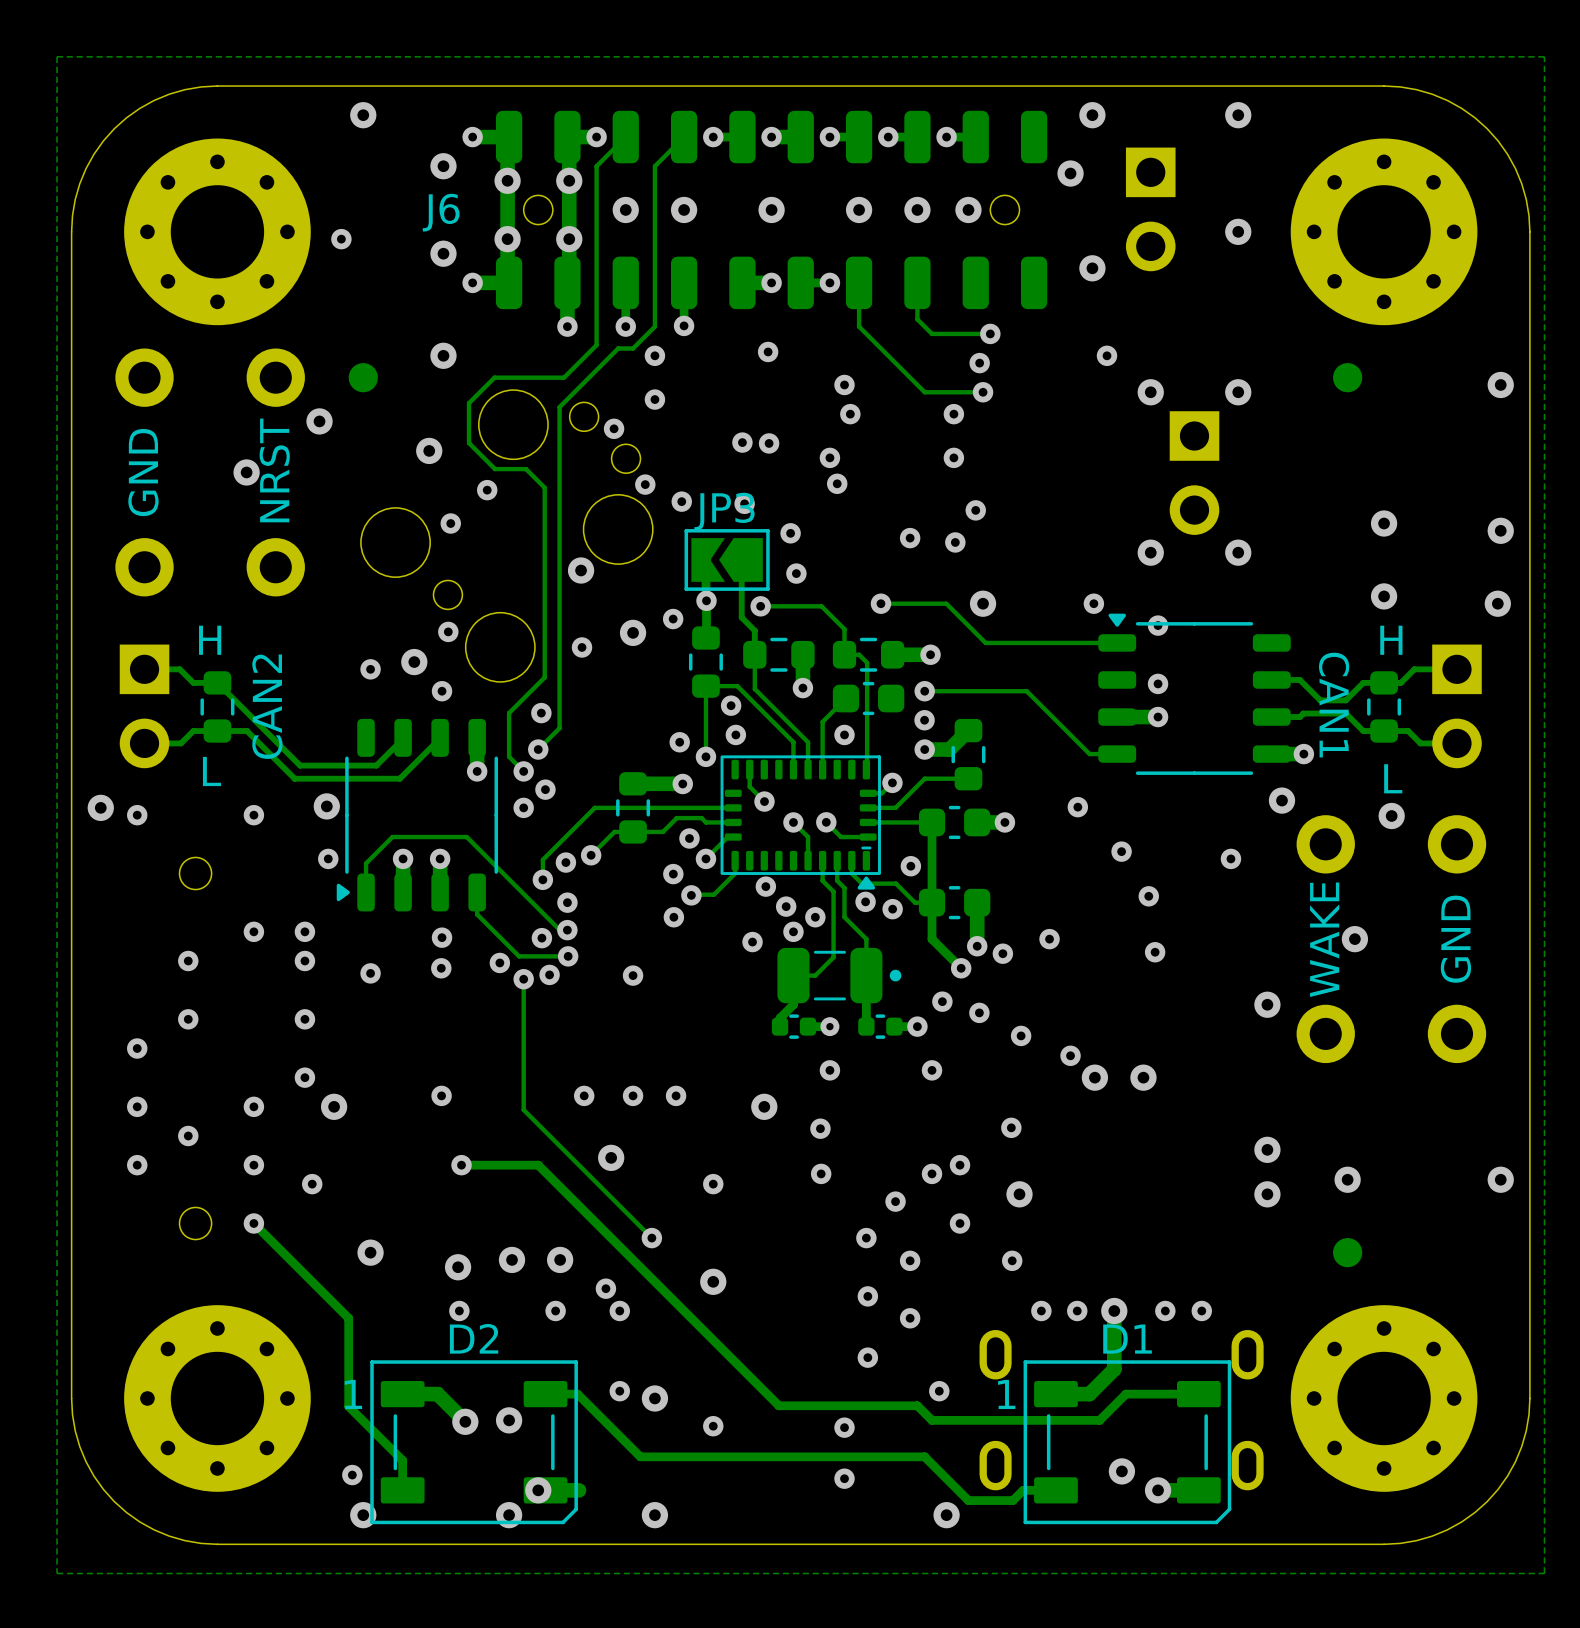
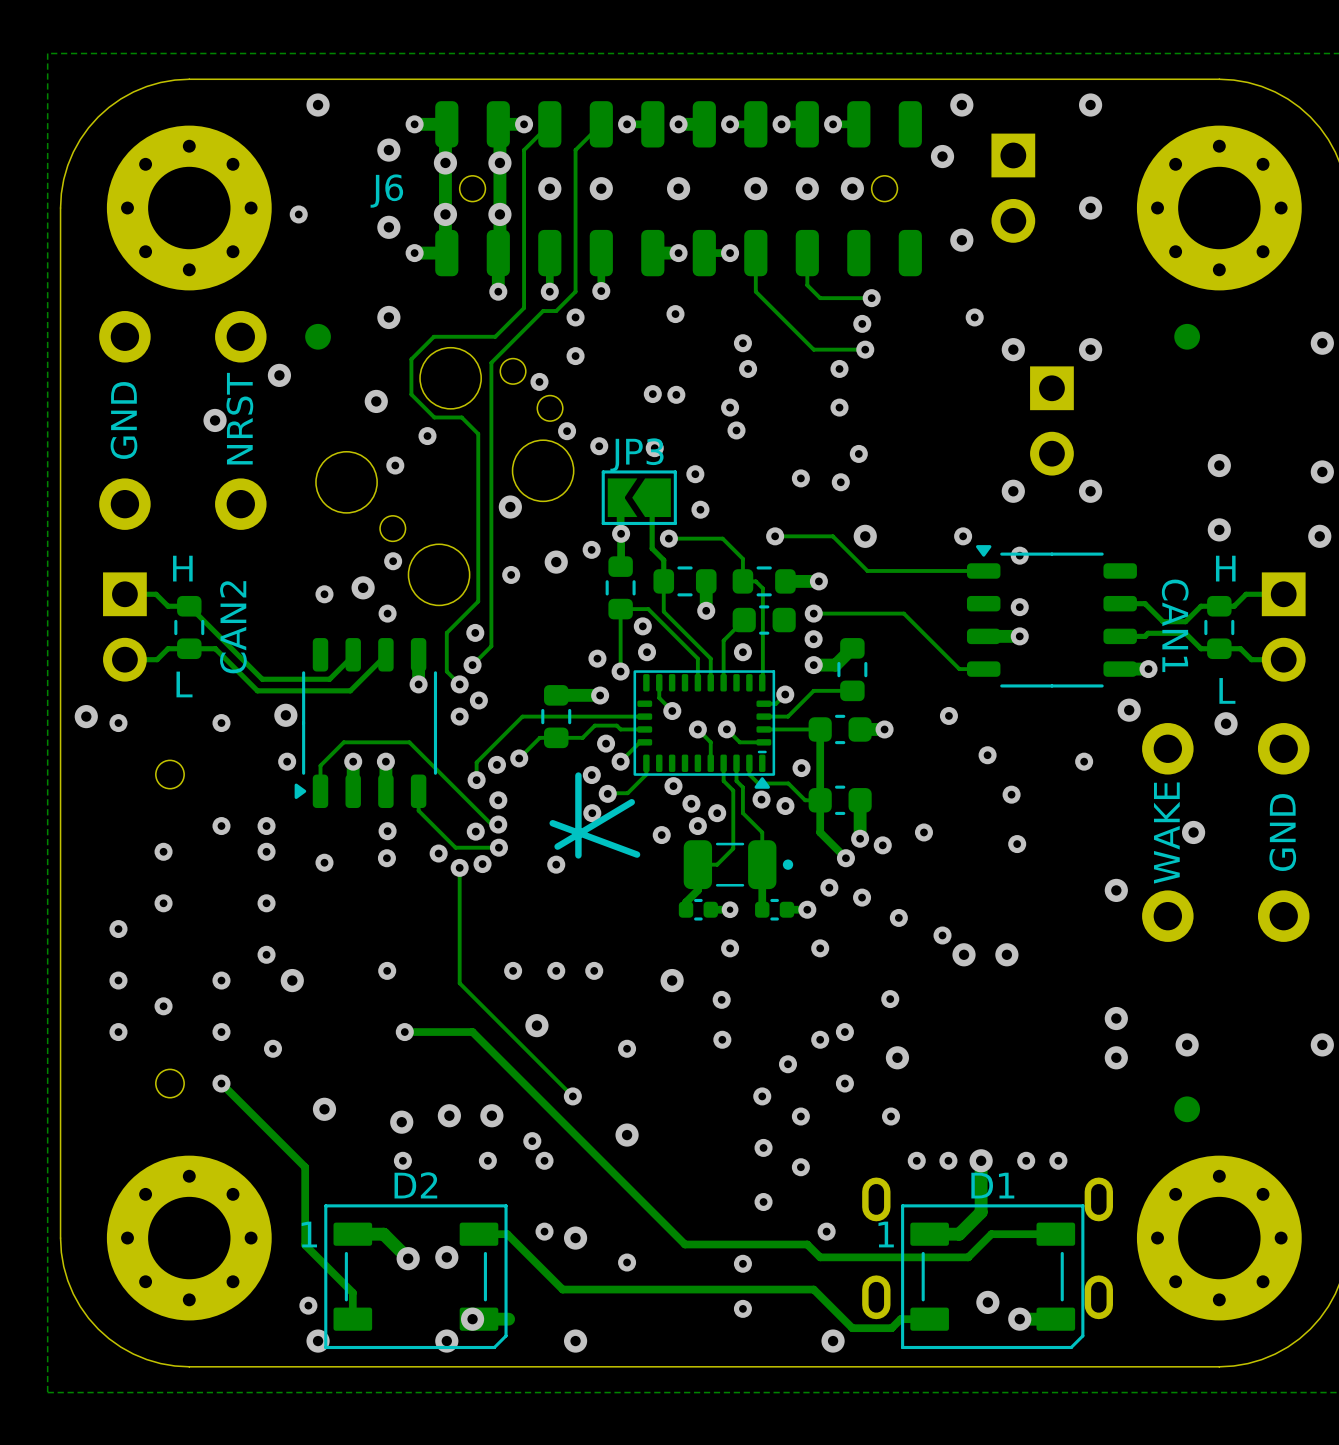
line: none -> (578, 775) (578, 855)
line: none -> (631, 802) (557, 846)
line: none -> (552, 823) (637, 854)

